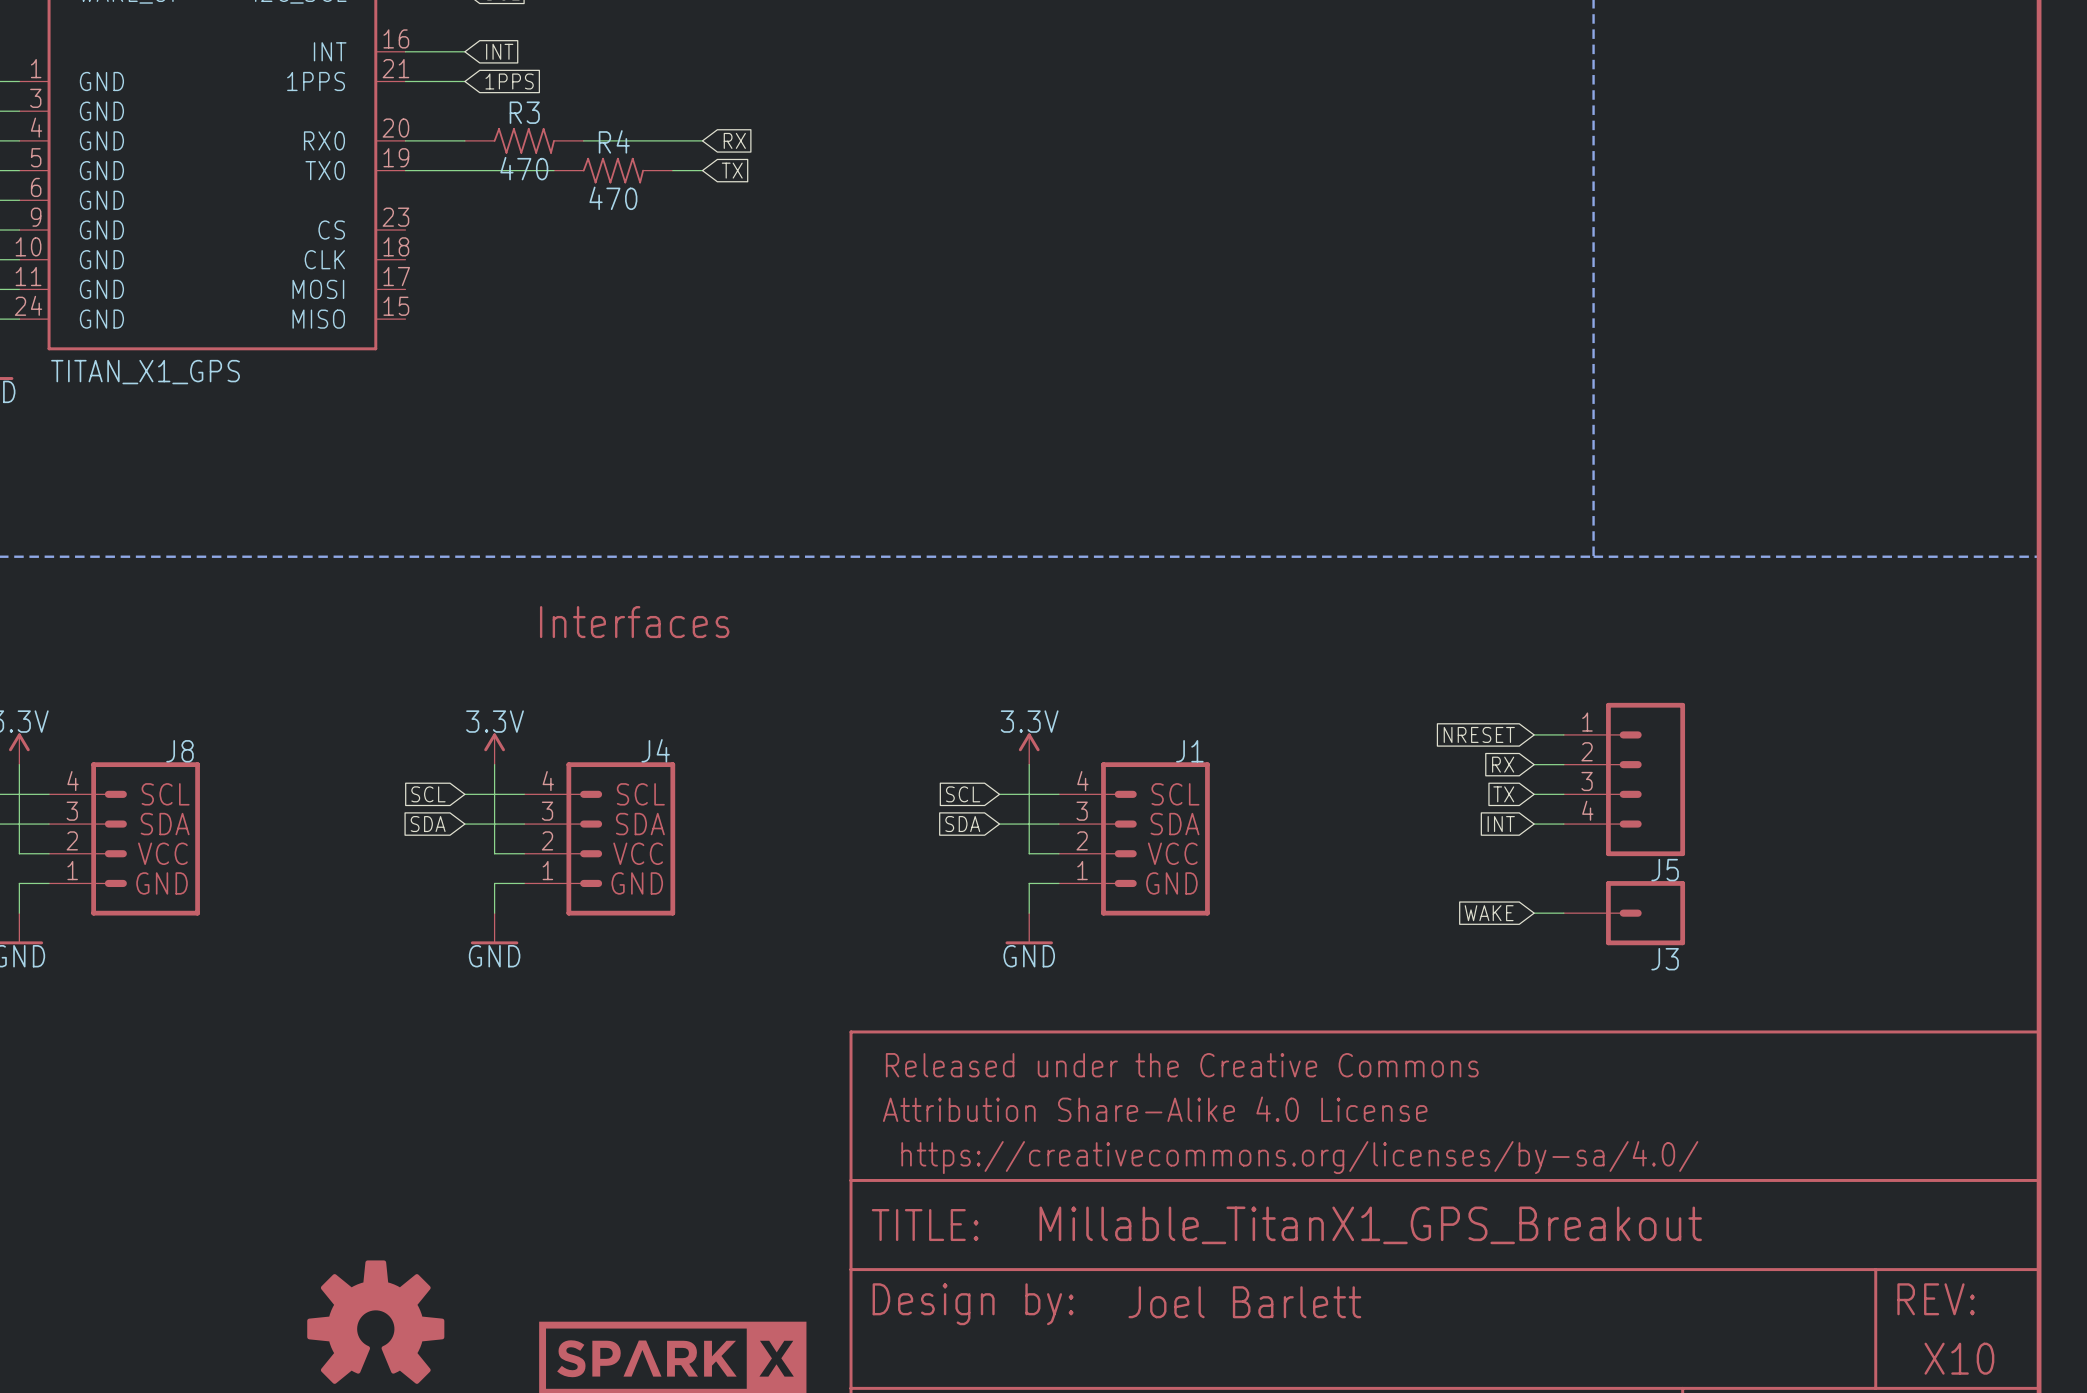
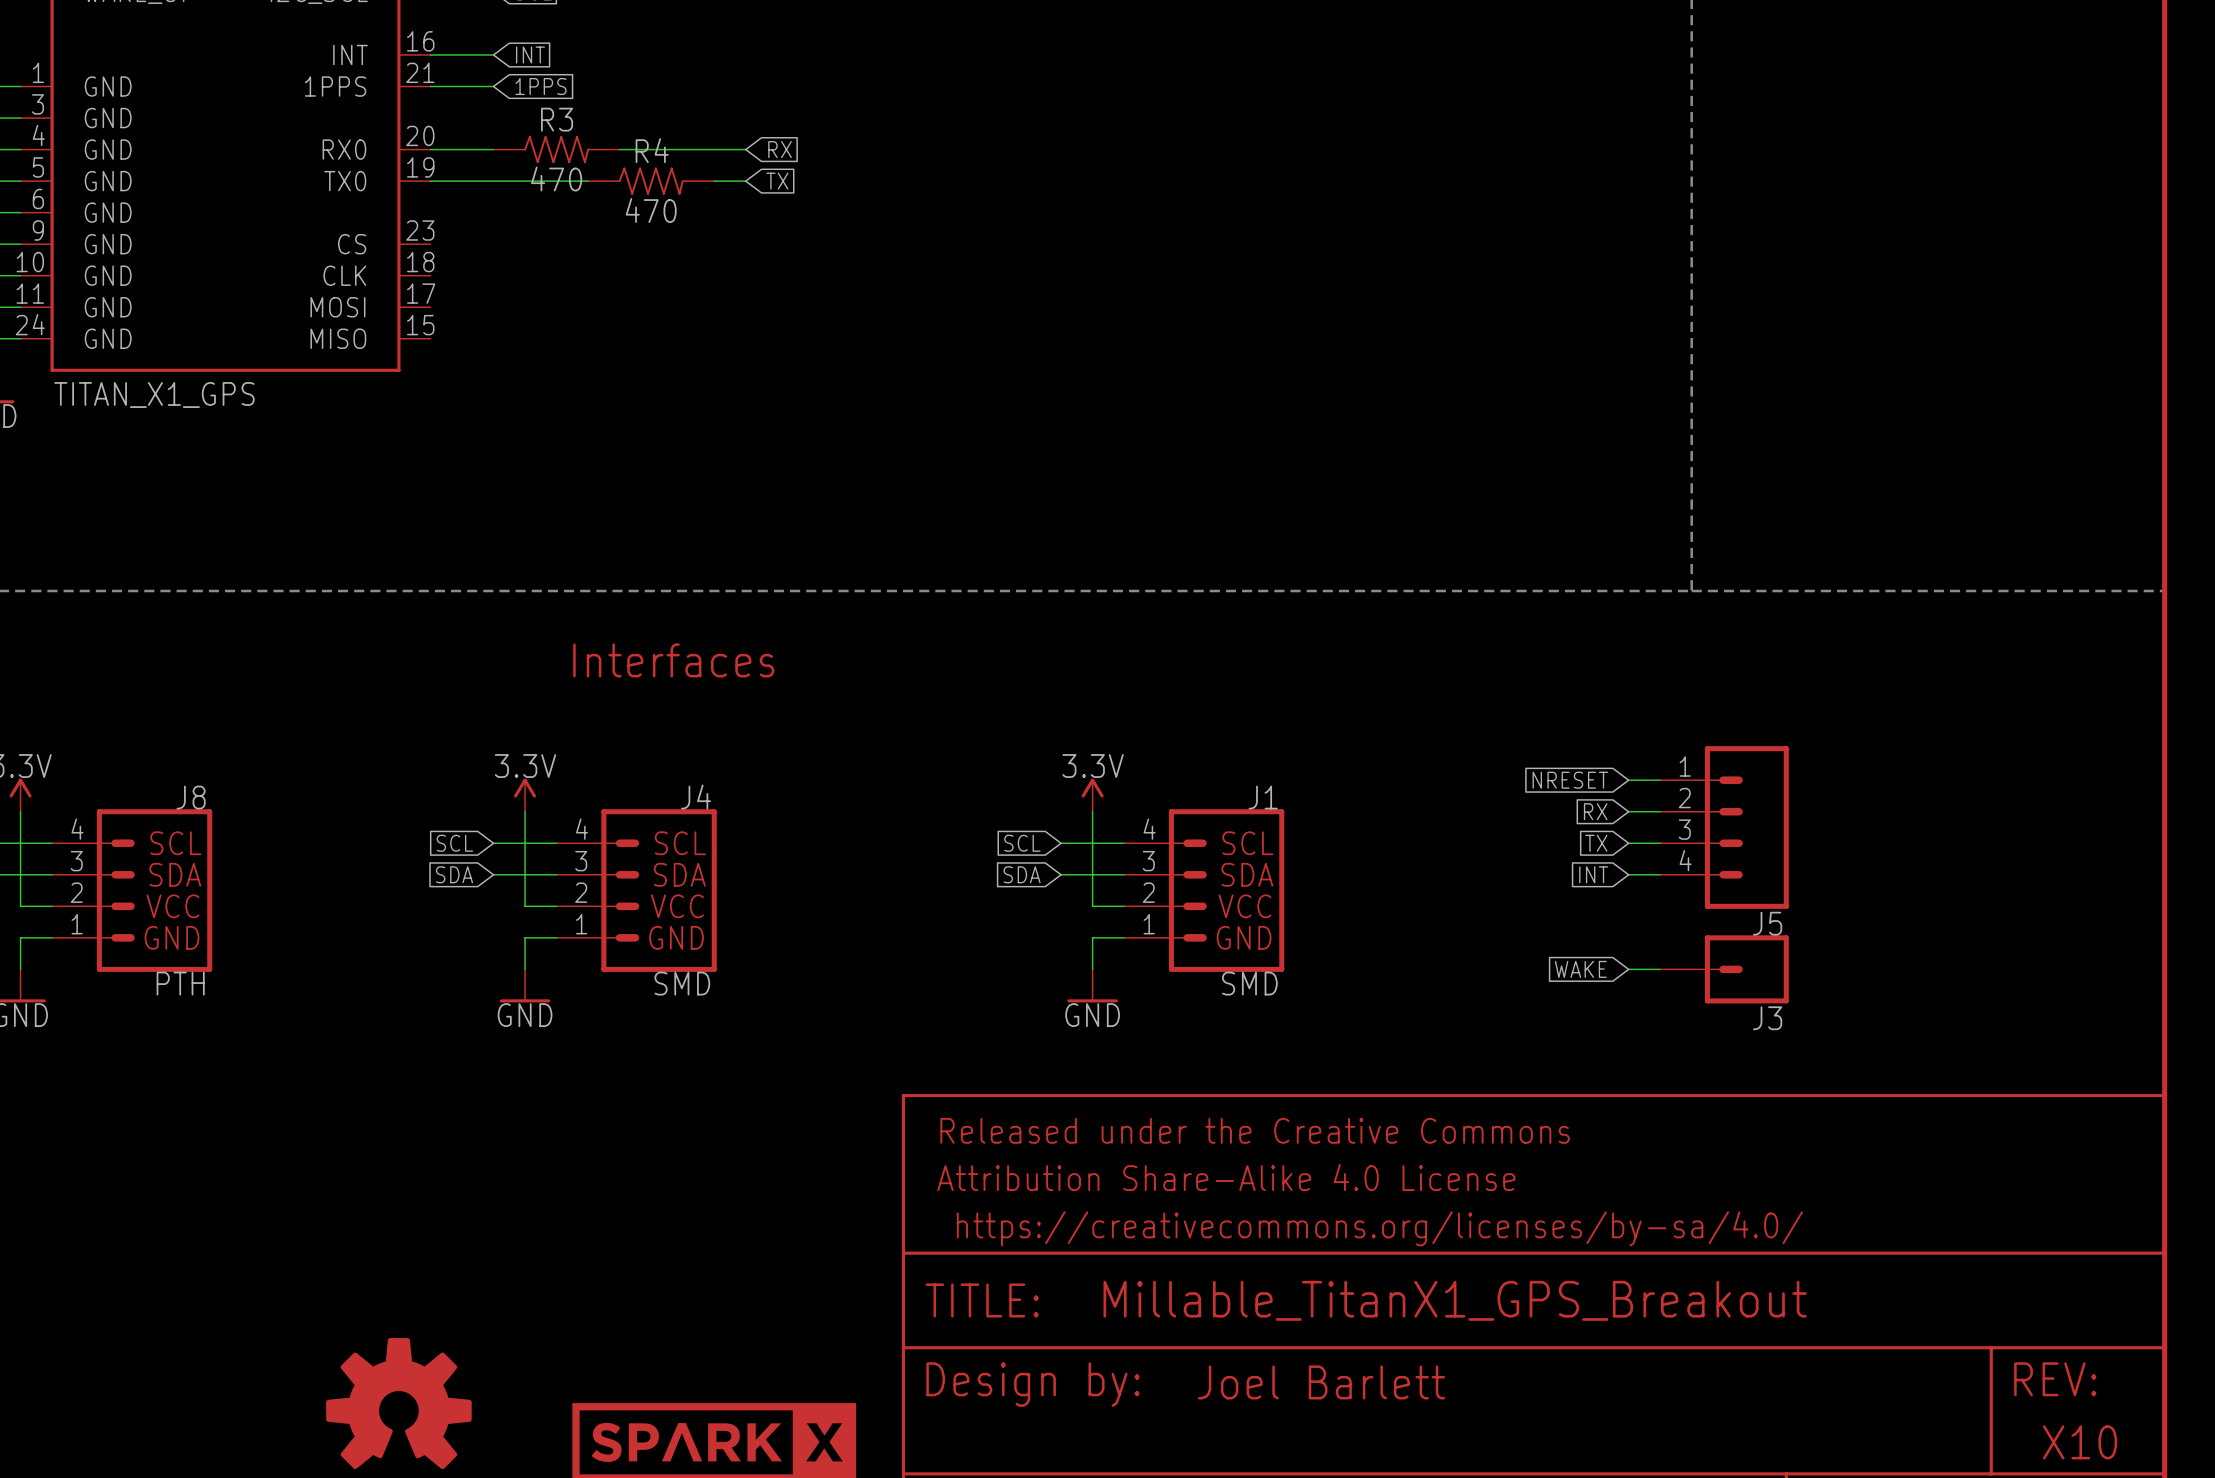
J8 value: none -> PTH (180, 983)
J4 value: none -> SMD (682, 983)
J1 value: none -> SMD (1249, 983)

